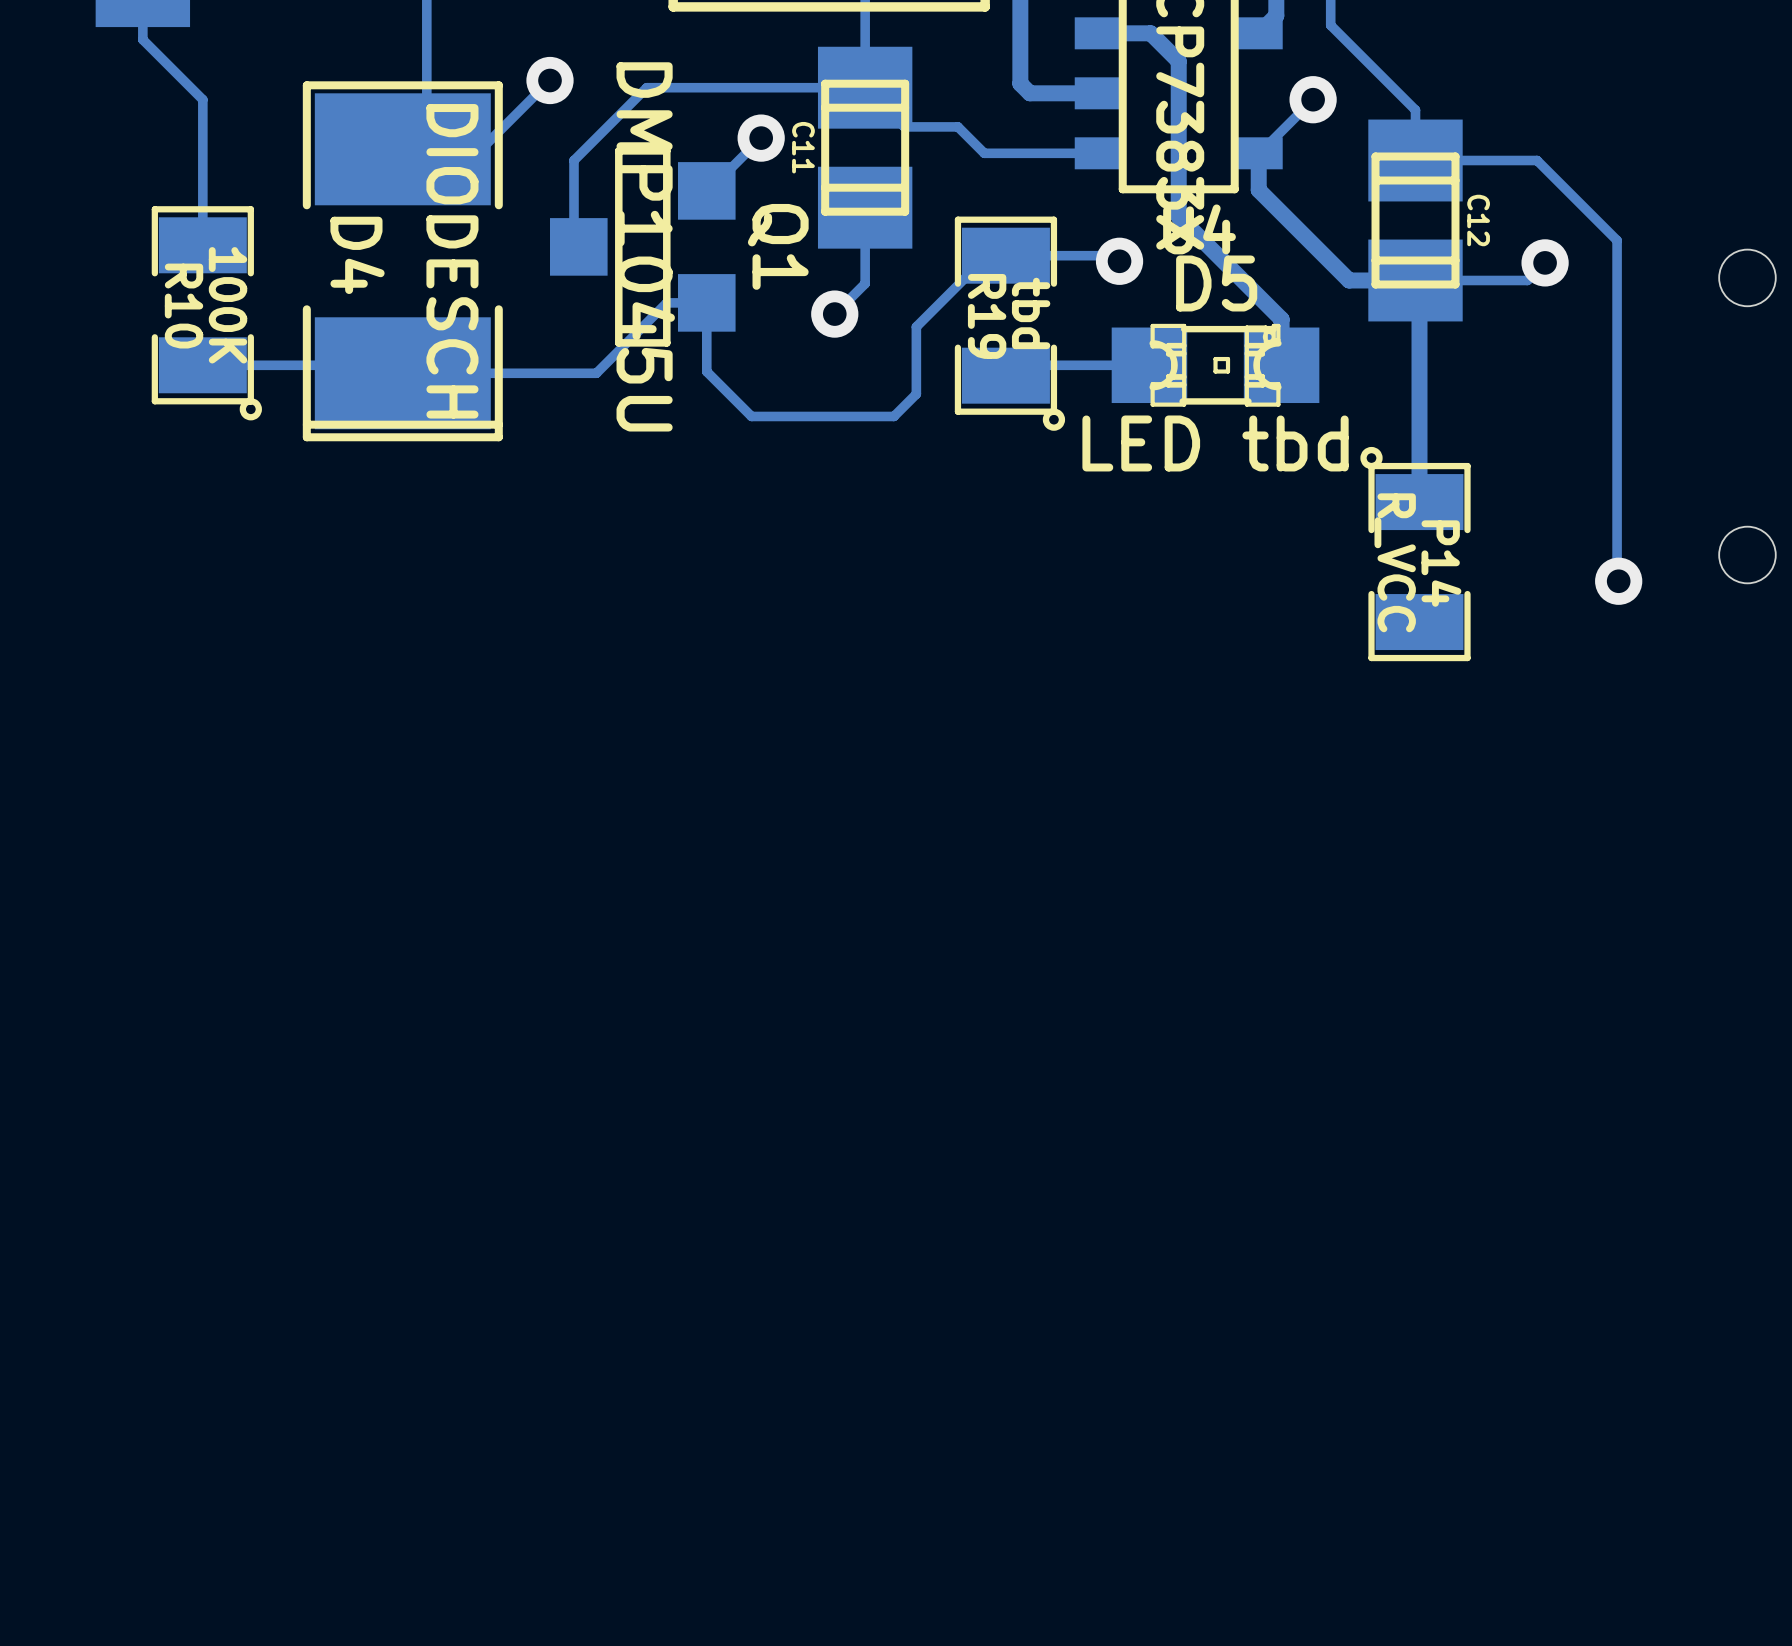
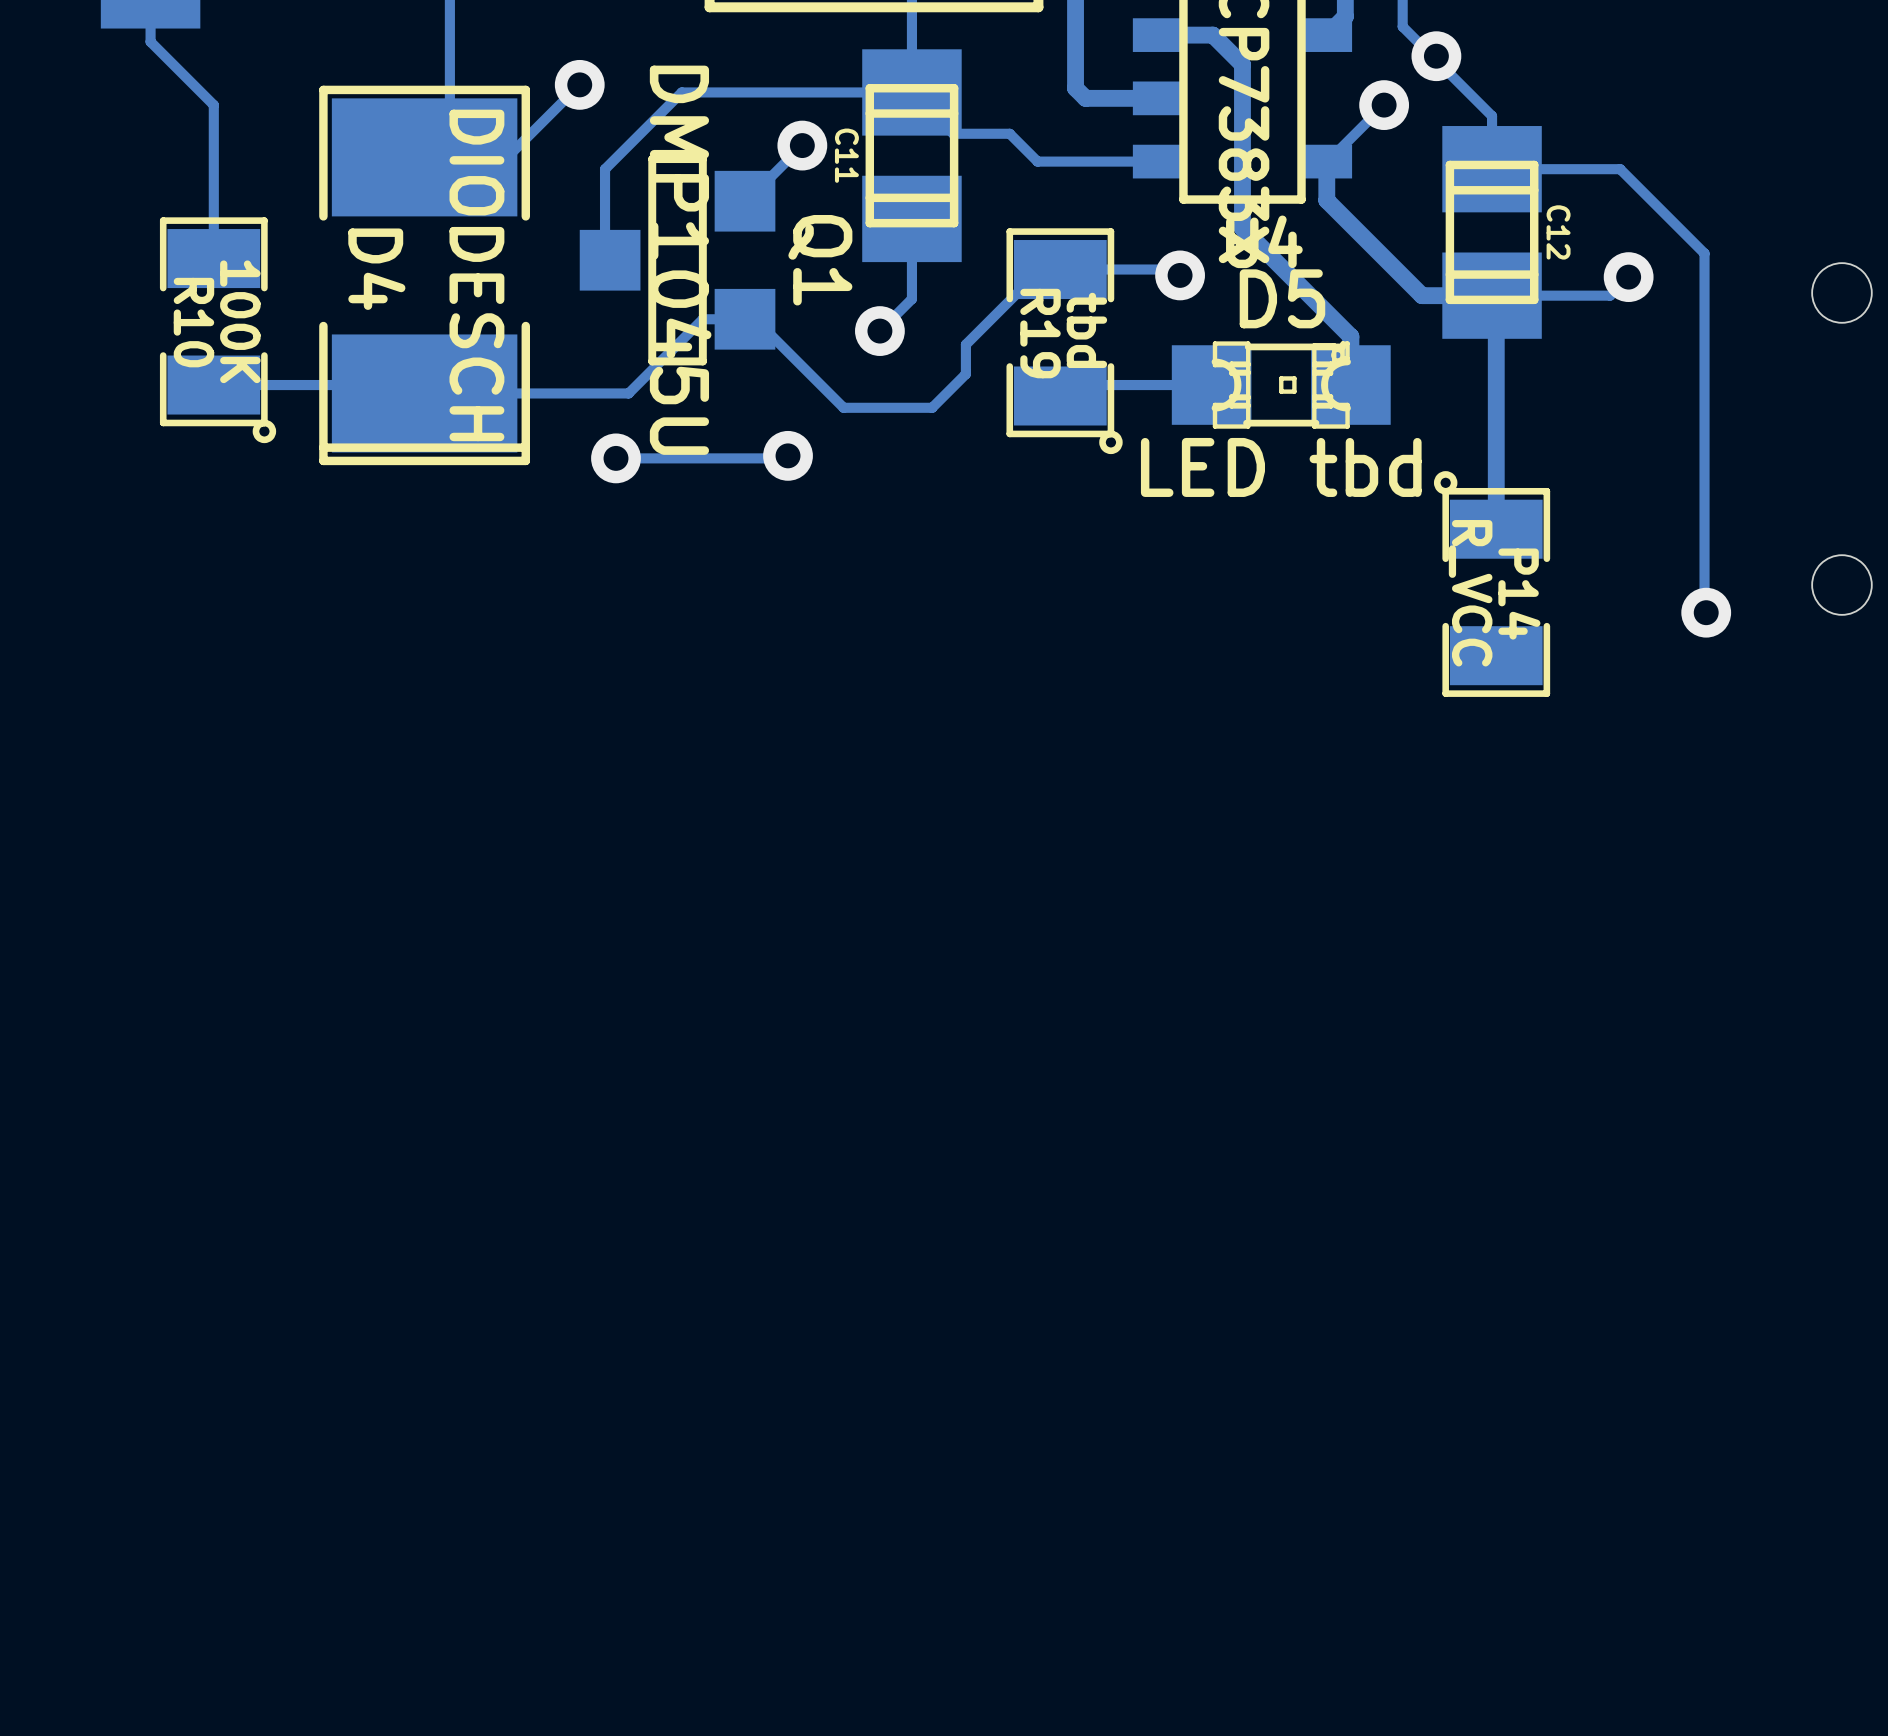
via: none -> (1436, 56)
track: (706, 302) (706, 371) (751, 416) (893, 416) (916, 394) (916, 354) -> (745, 319) (755, 319) (843, 407) (932, 407) (965, 374)
track: none -> (788, 455) (785, 458) (616, 458)
via: none -> (788, 455)
via: none -> (616, 458)

